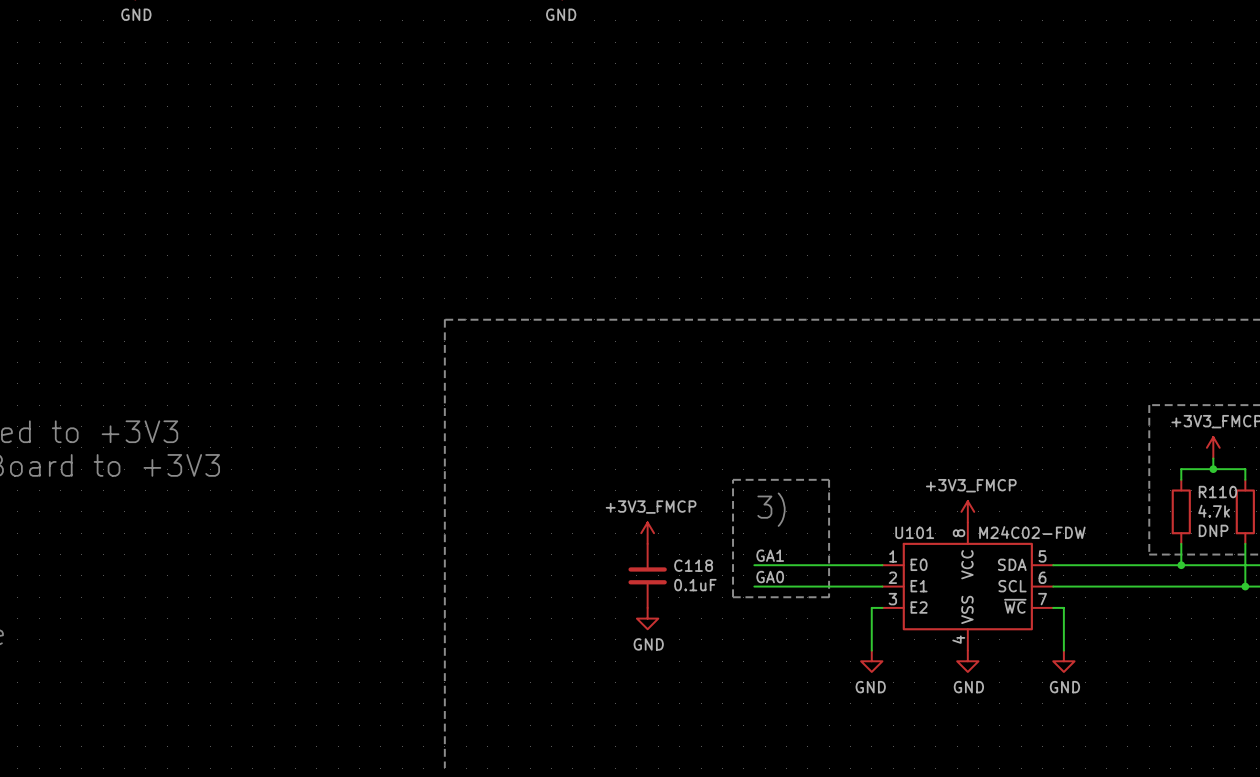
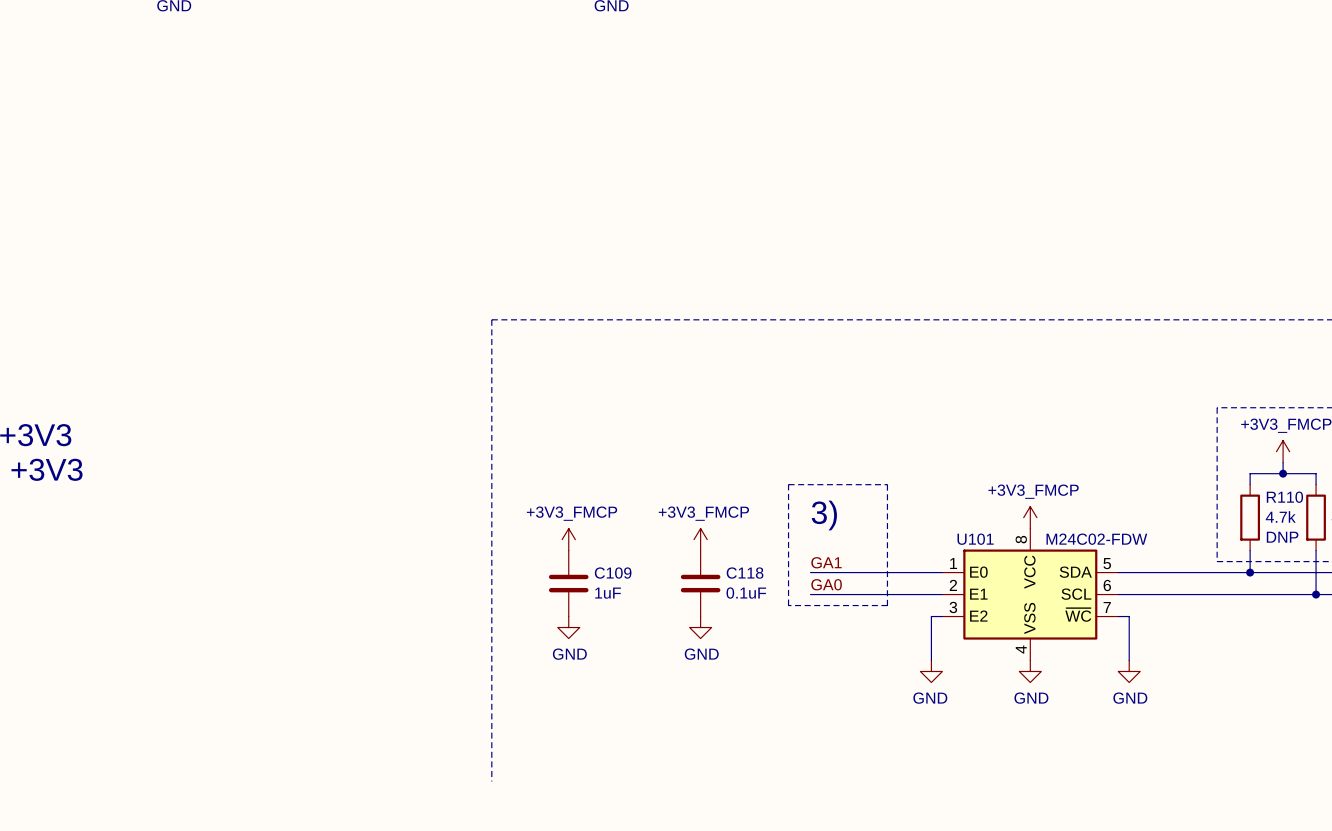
power symbol: none -> +3V3_FMCP (568, 539)
C109: none -> 1uF (568, 583)
power symbol: none -> GND (568, 627)

